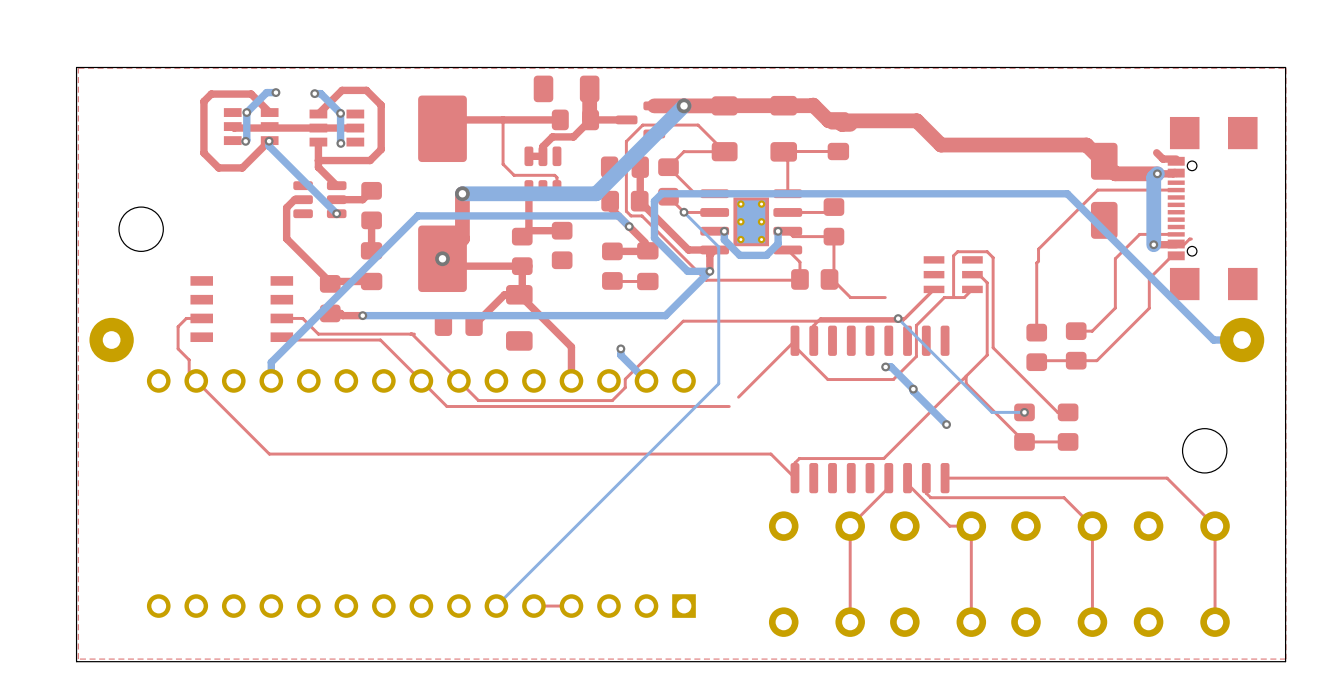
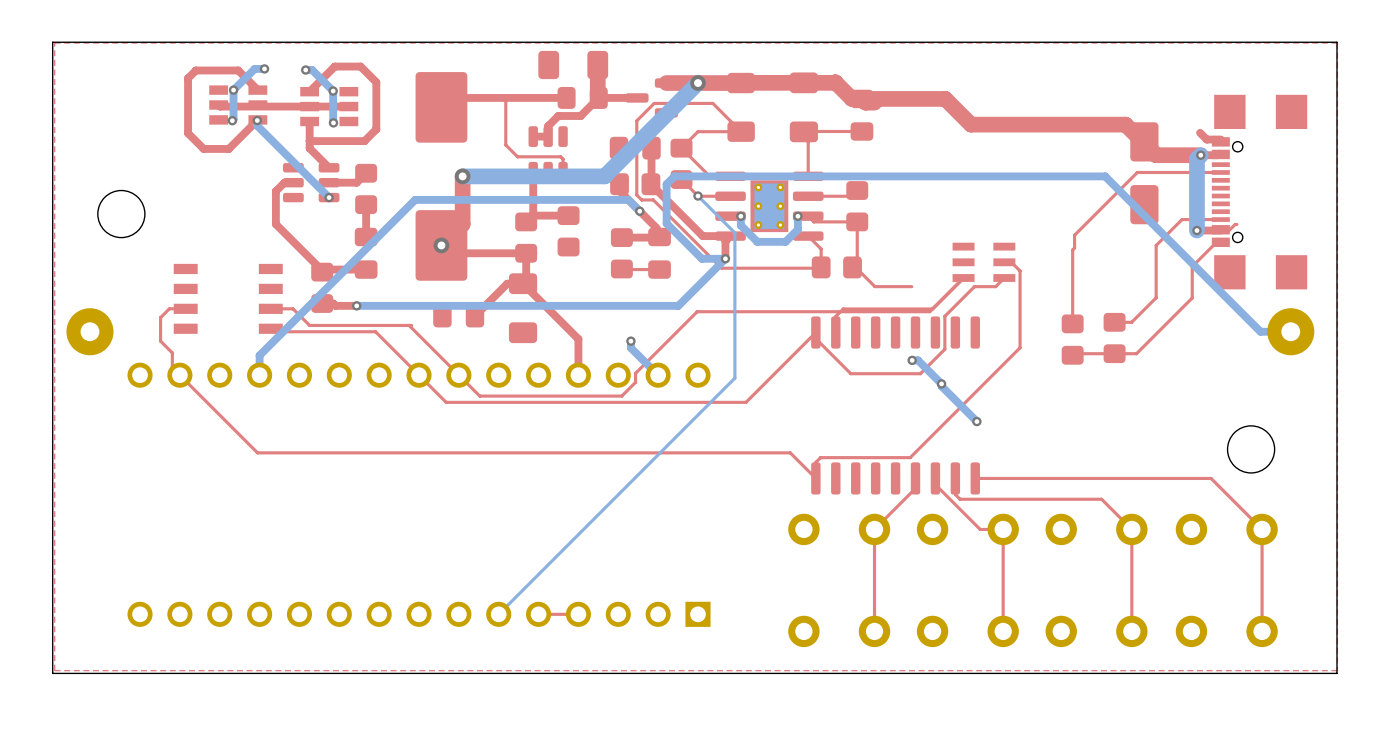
top track: (953, 297) (953, 255) (957, 251) (987, 251) (993, 257) (993, 347) (1057, 412) (1068, 412) -> none
bottom track: (898, 318) (992, 412) (1024, 412) -> none
via: (898, 318) -> none
top track: (966, 376) (966, 383) (1024, 441) (1068, 441) -> none
top track: none -> (755, 392) (746, 402)
via: (1024, 412) -> none
part: (1024, 427) -> none
part: (1068, 427) -> none

